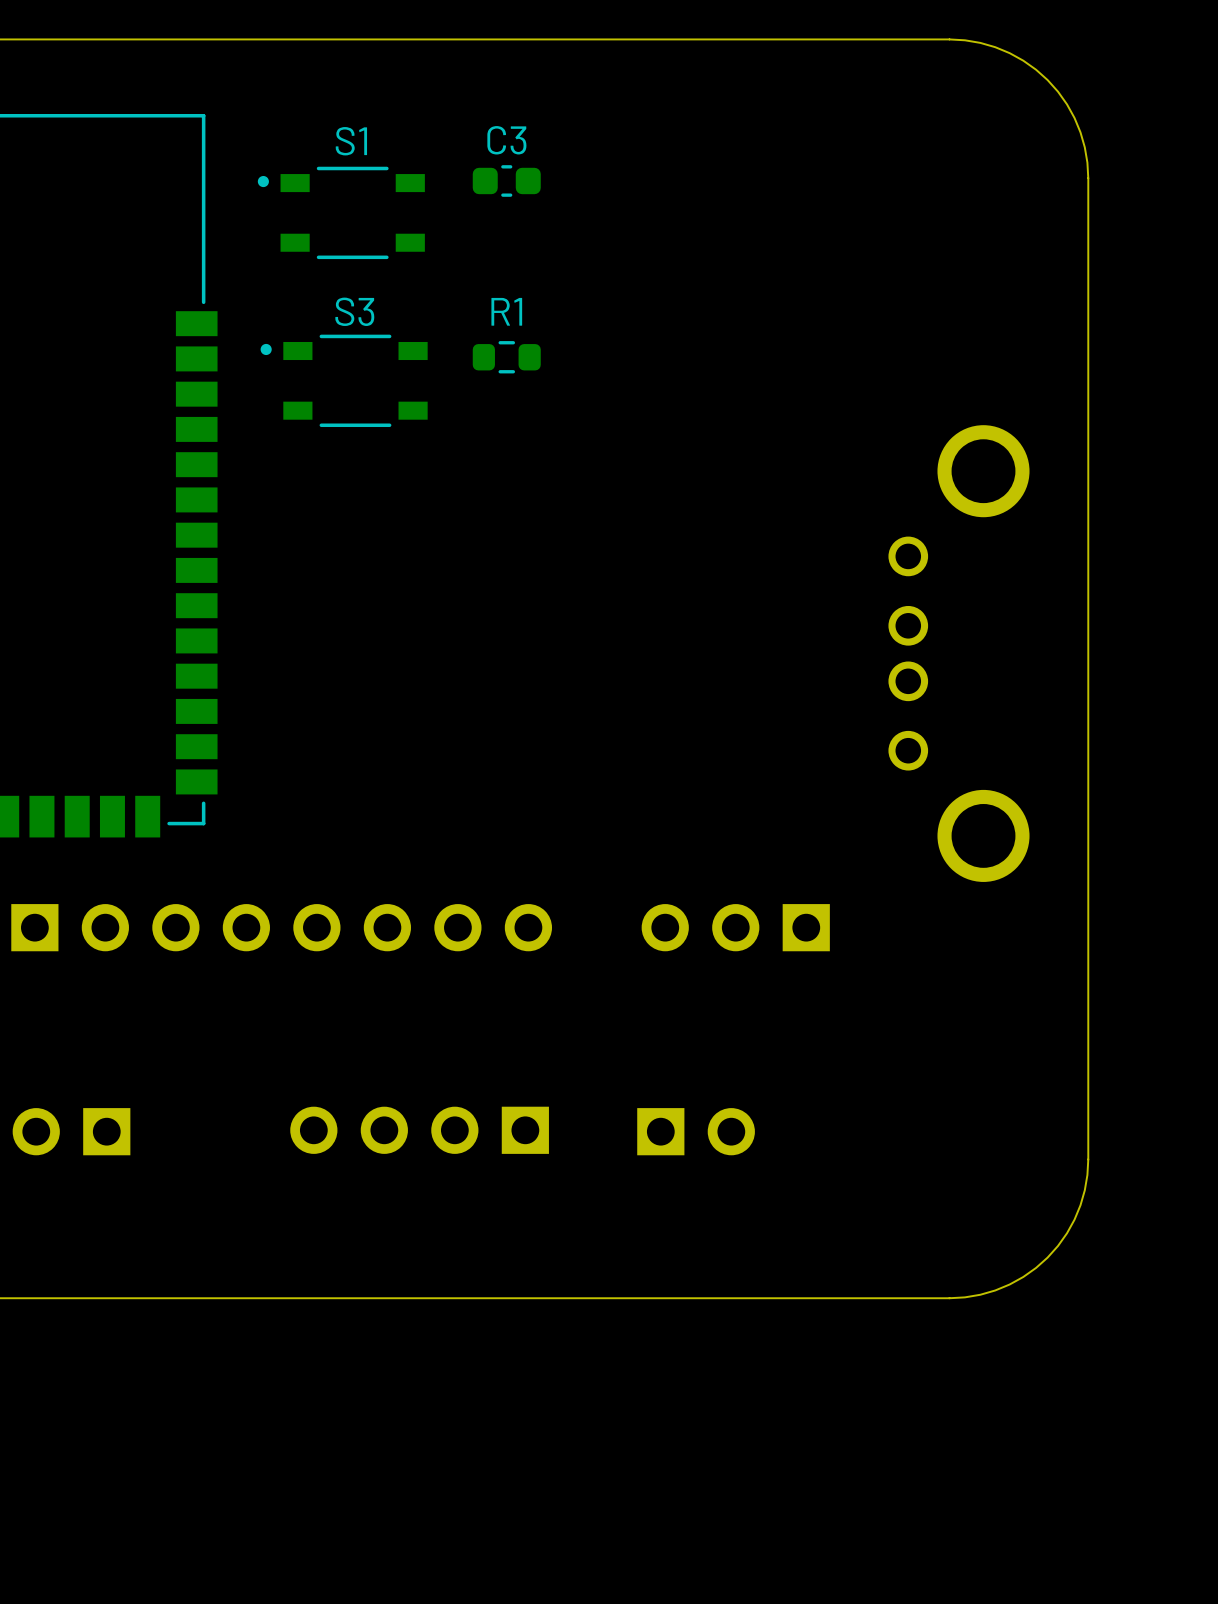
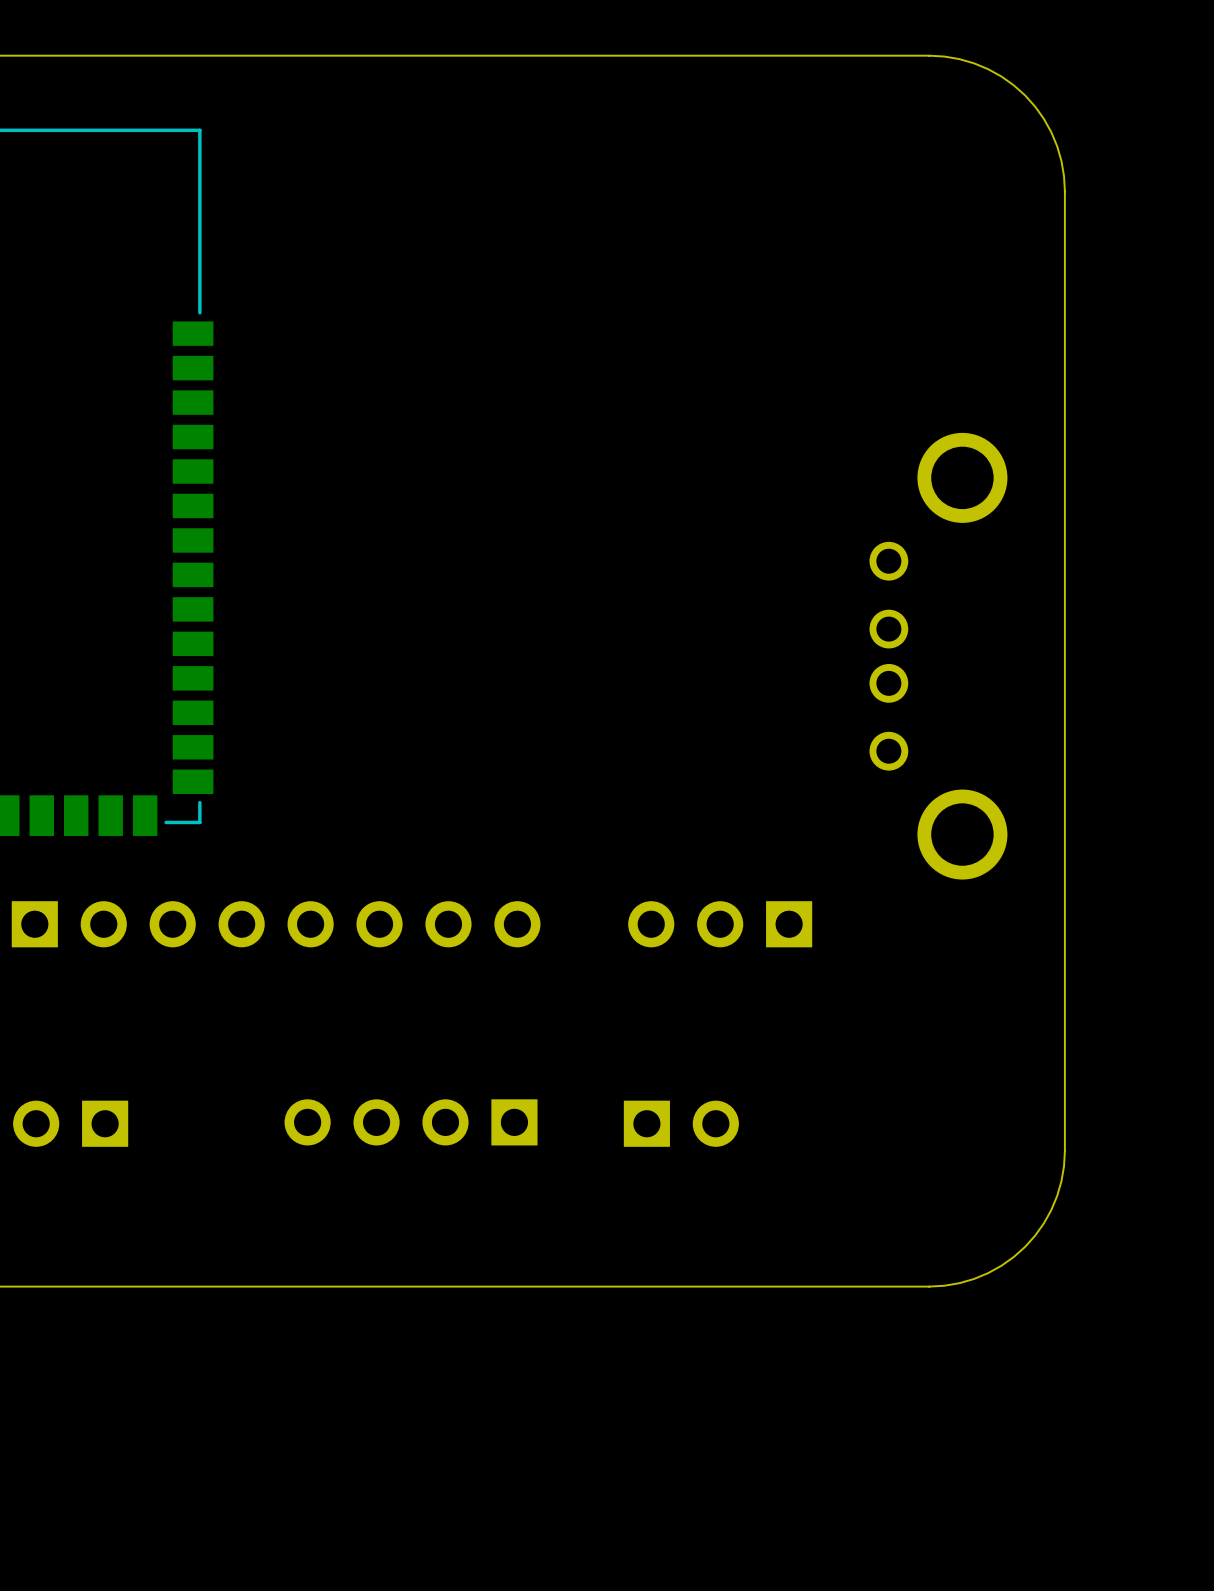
C3: (506, 180) -> none
S1: (341, 212) -> none
R1: (506, 357) -> none
S3: (344, 380) -> none

